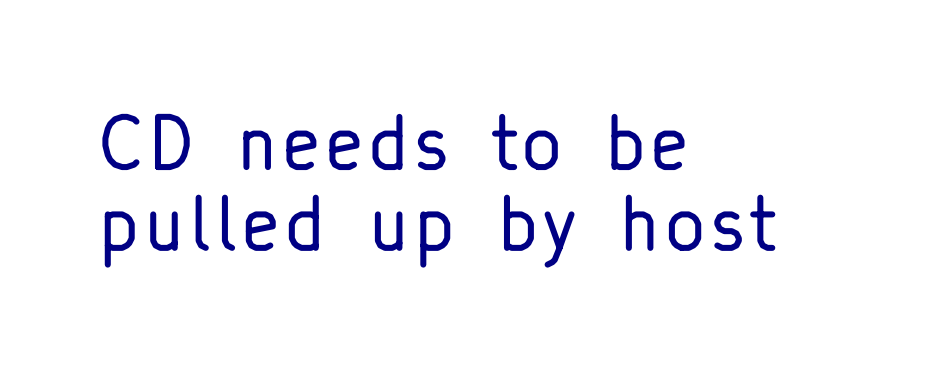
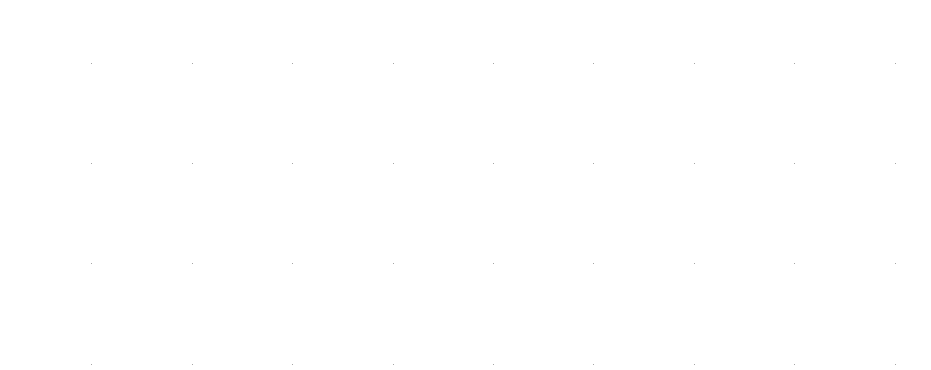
text: CD needs to be (393, 141) -> none
text: pulled up by host (440, 231) -> none

